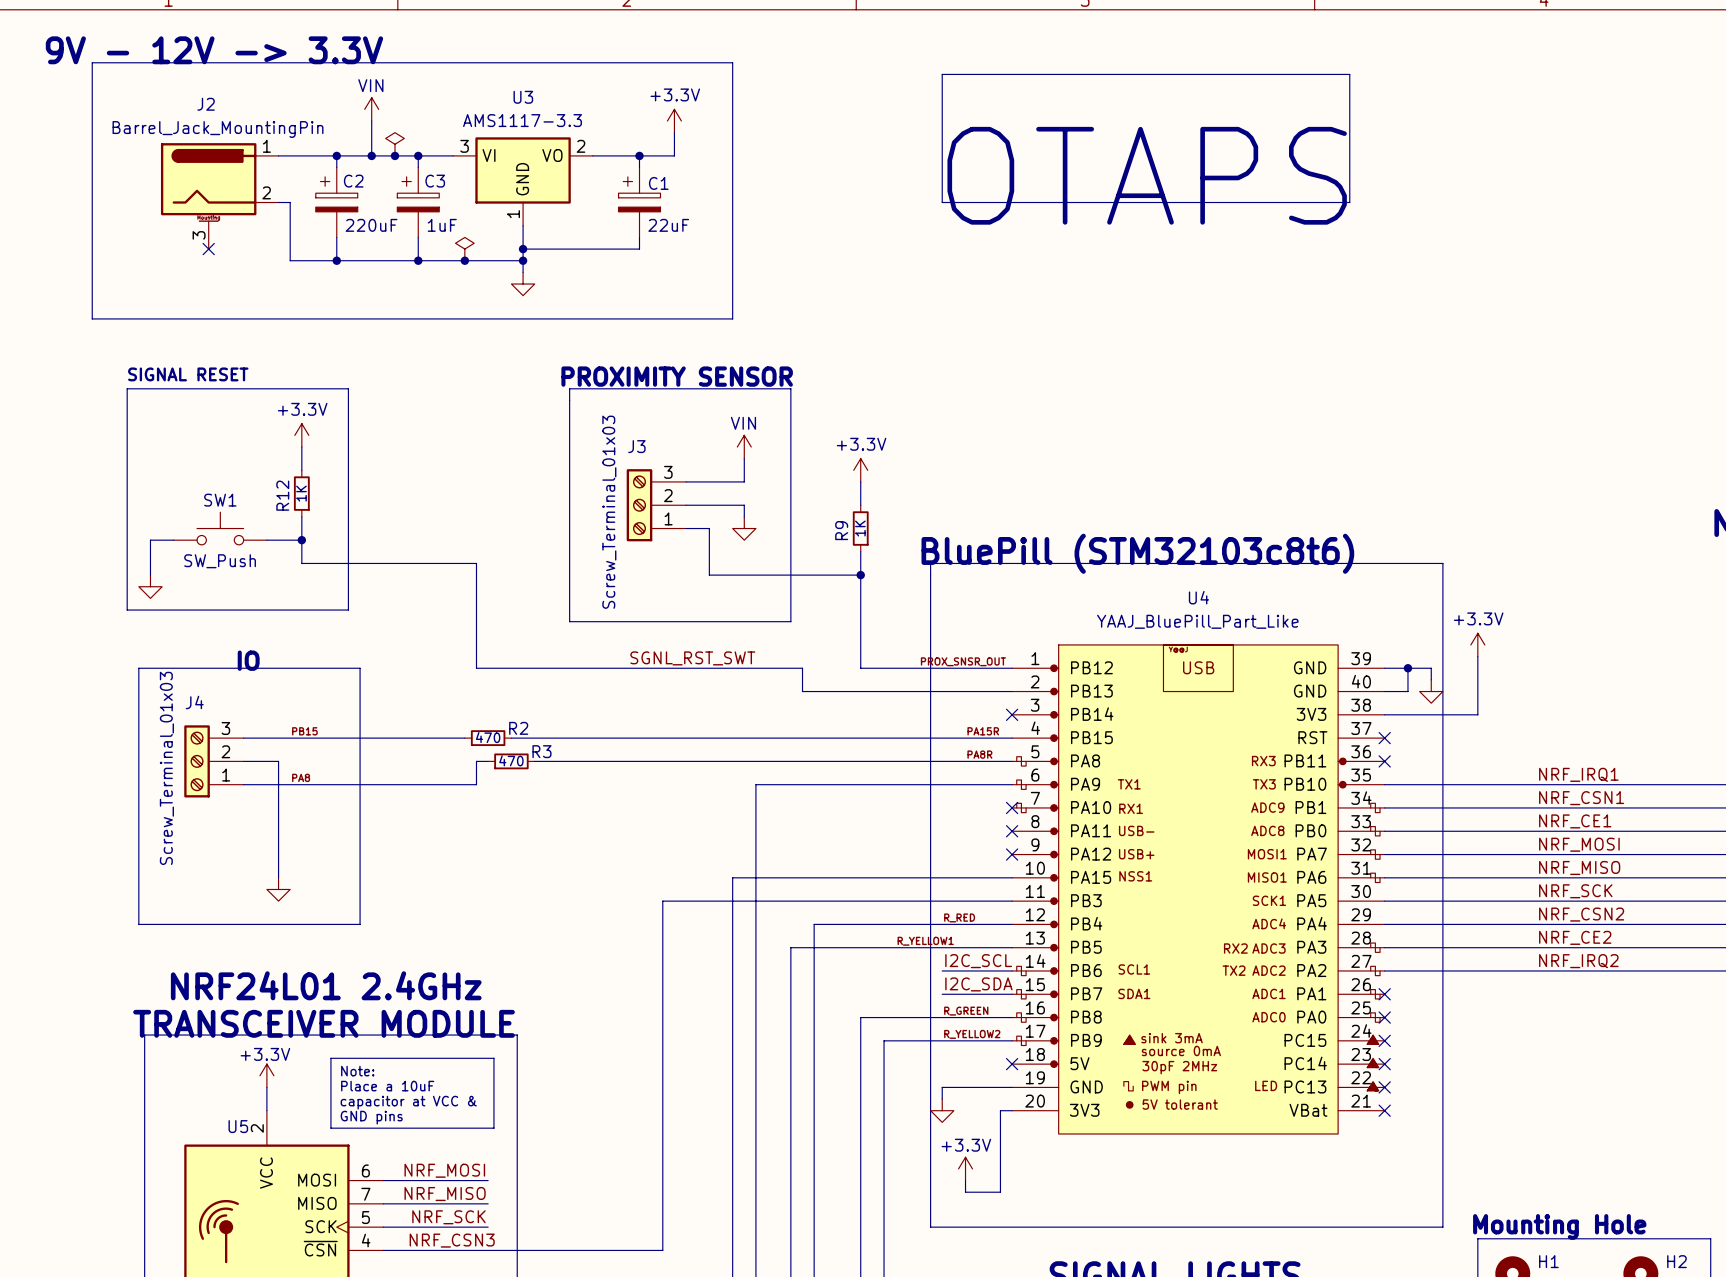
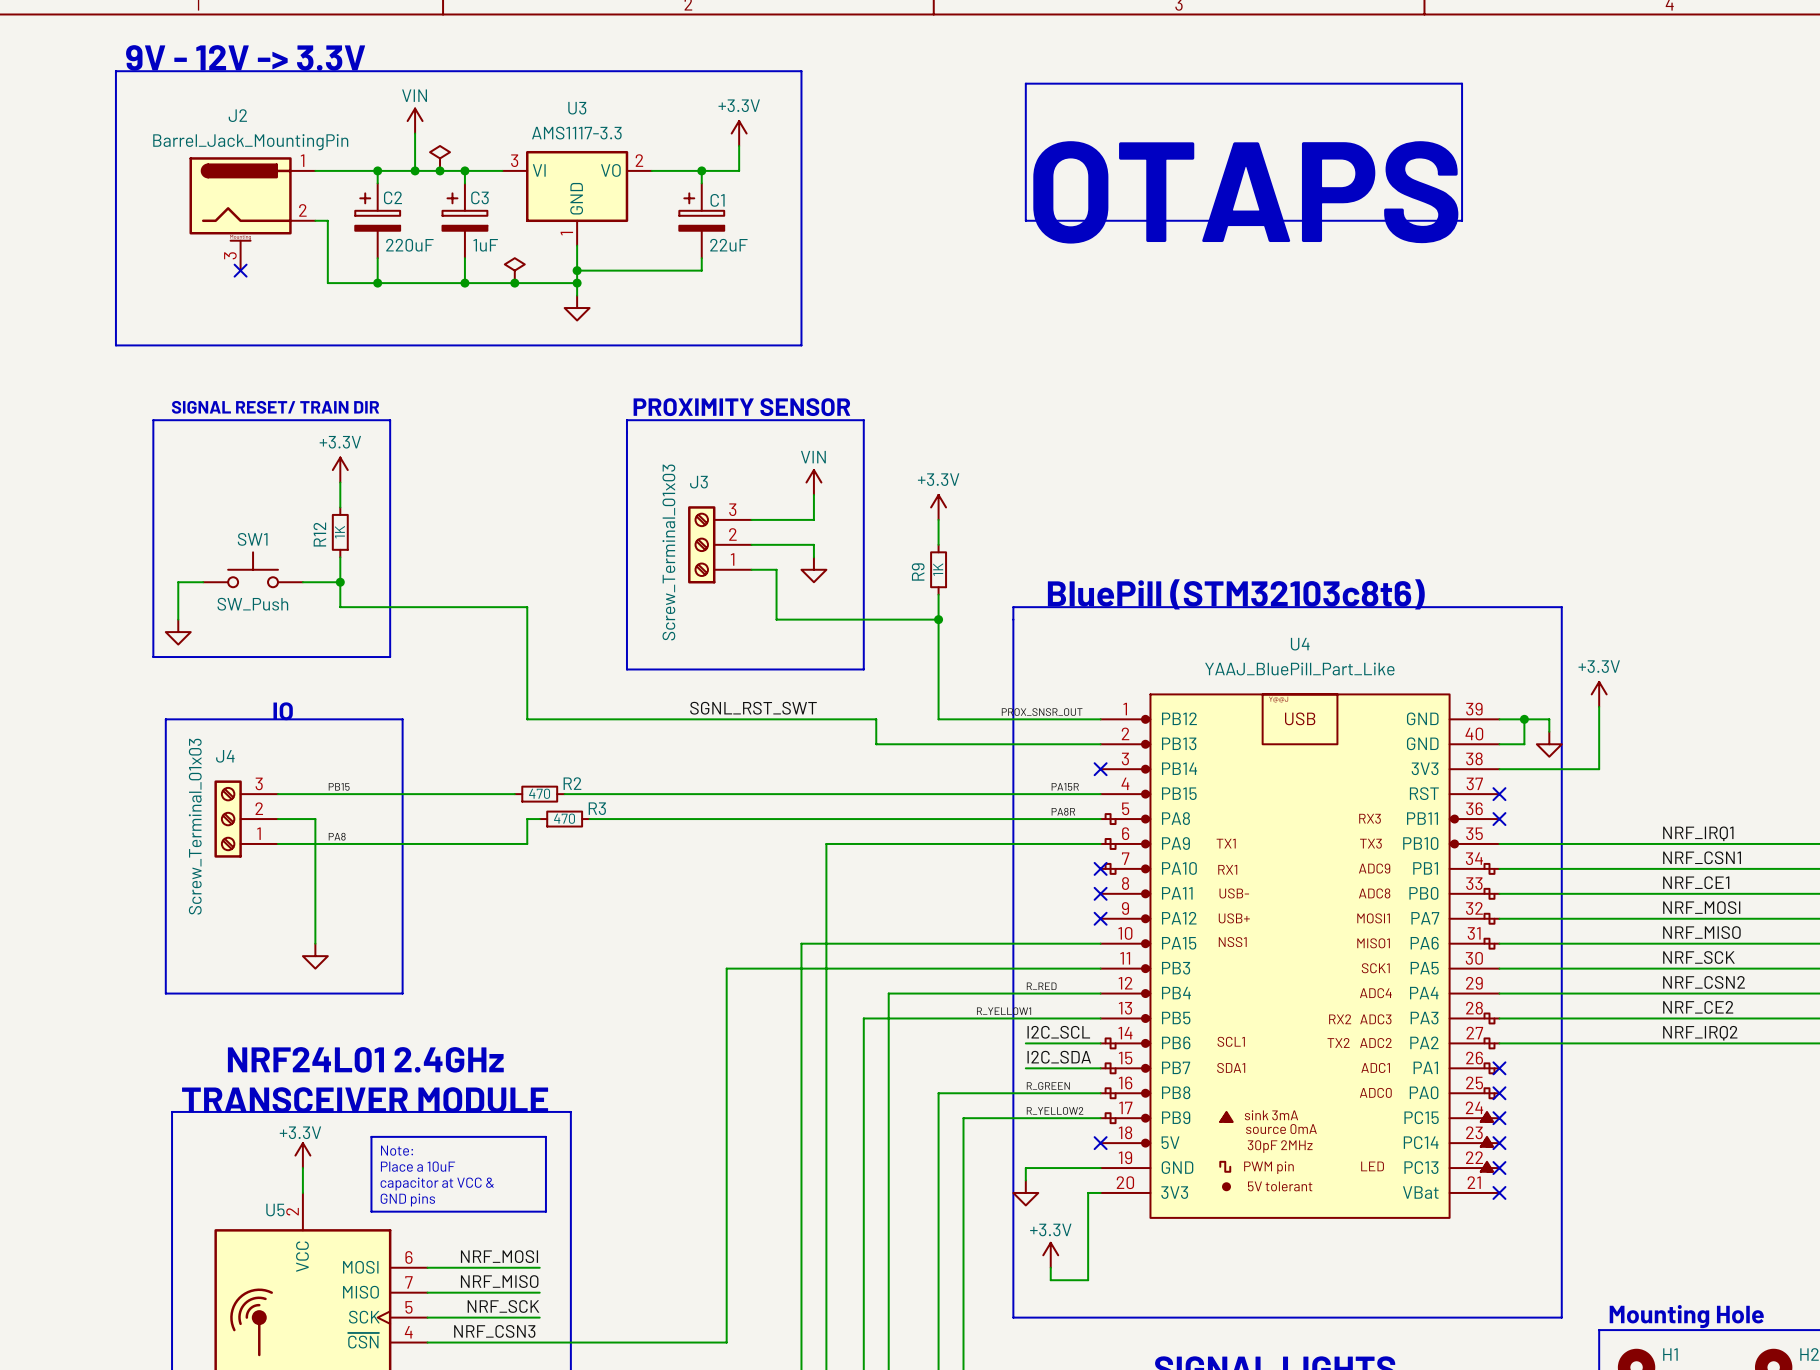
text: SIGNAL RESET (188, 374) -> SIGNAL RESET/ TRAIN DIR (275, 407)

